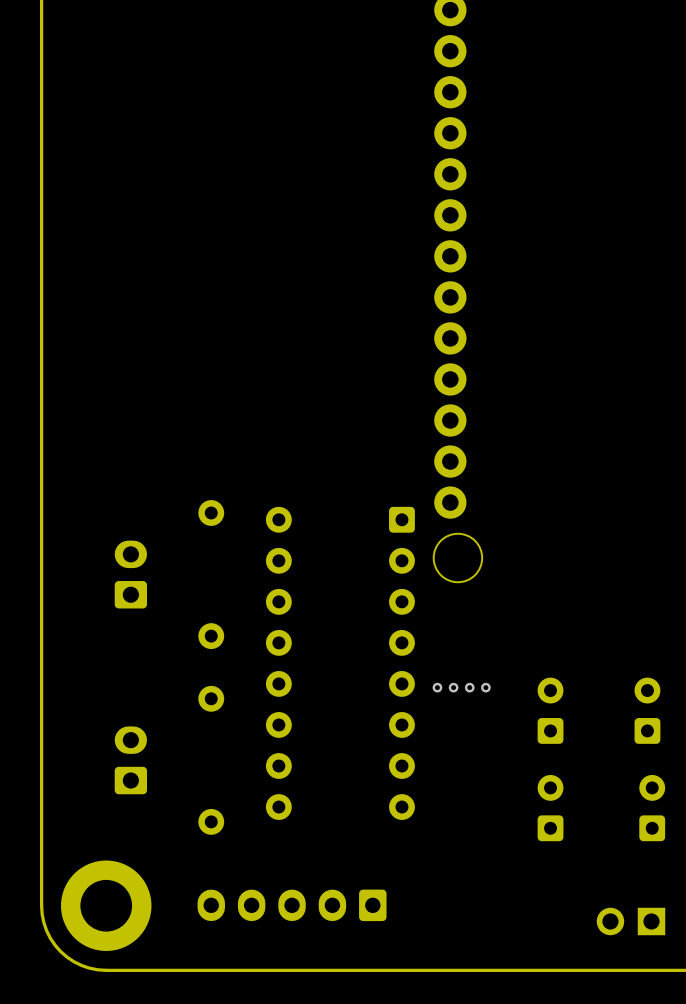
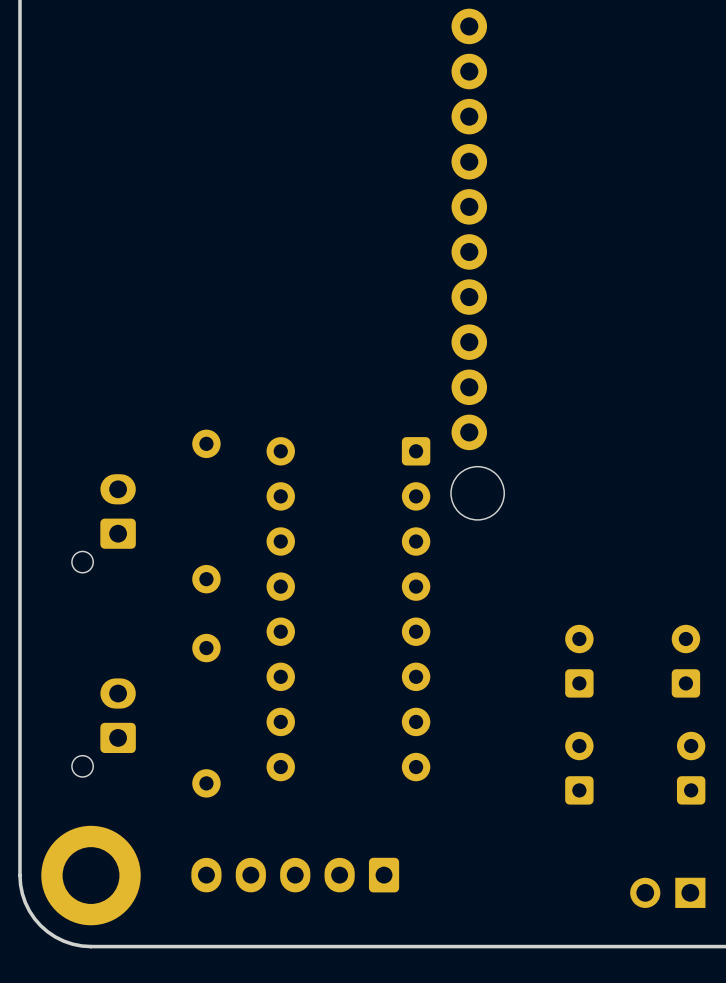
part: none -> (103, 523)
via: (437, 687) -> none
via: (453, 687) -> none
via: (469, 687) -> none
via: (485, 687) -> none
part: none -> (103, 727)

